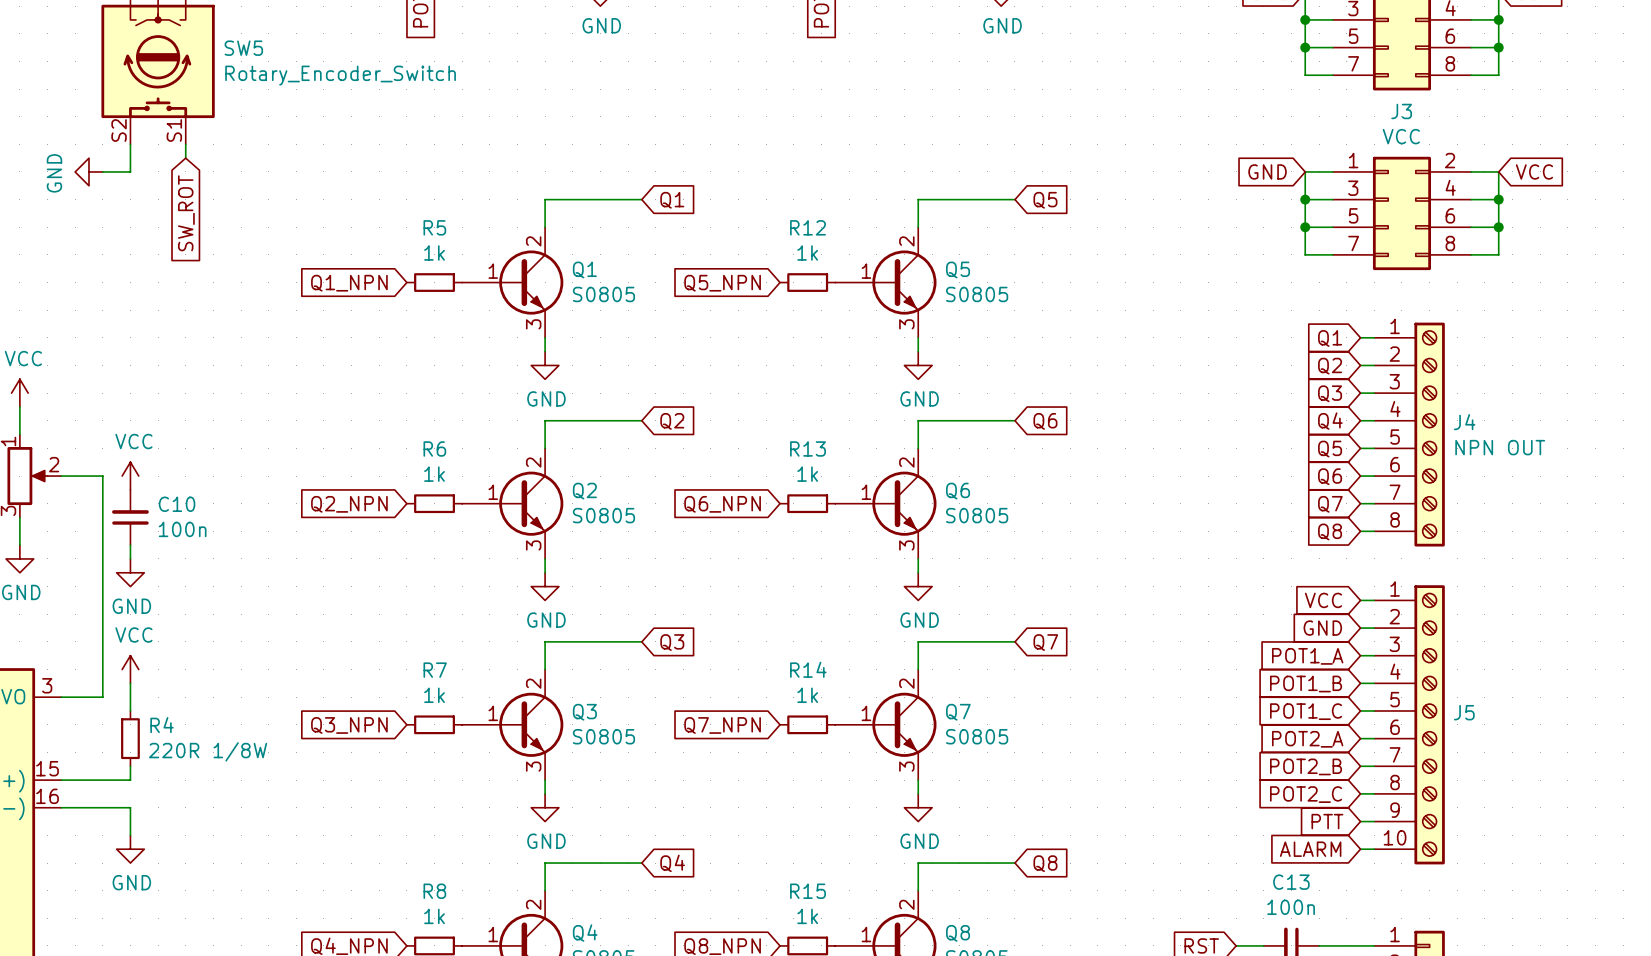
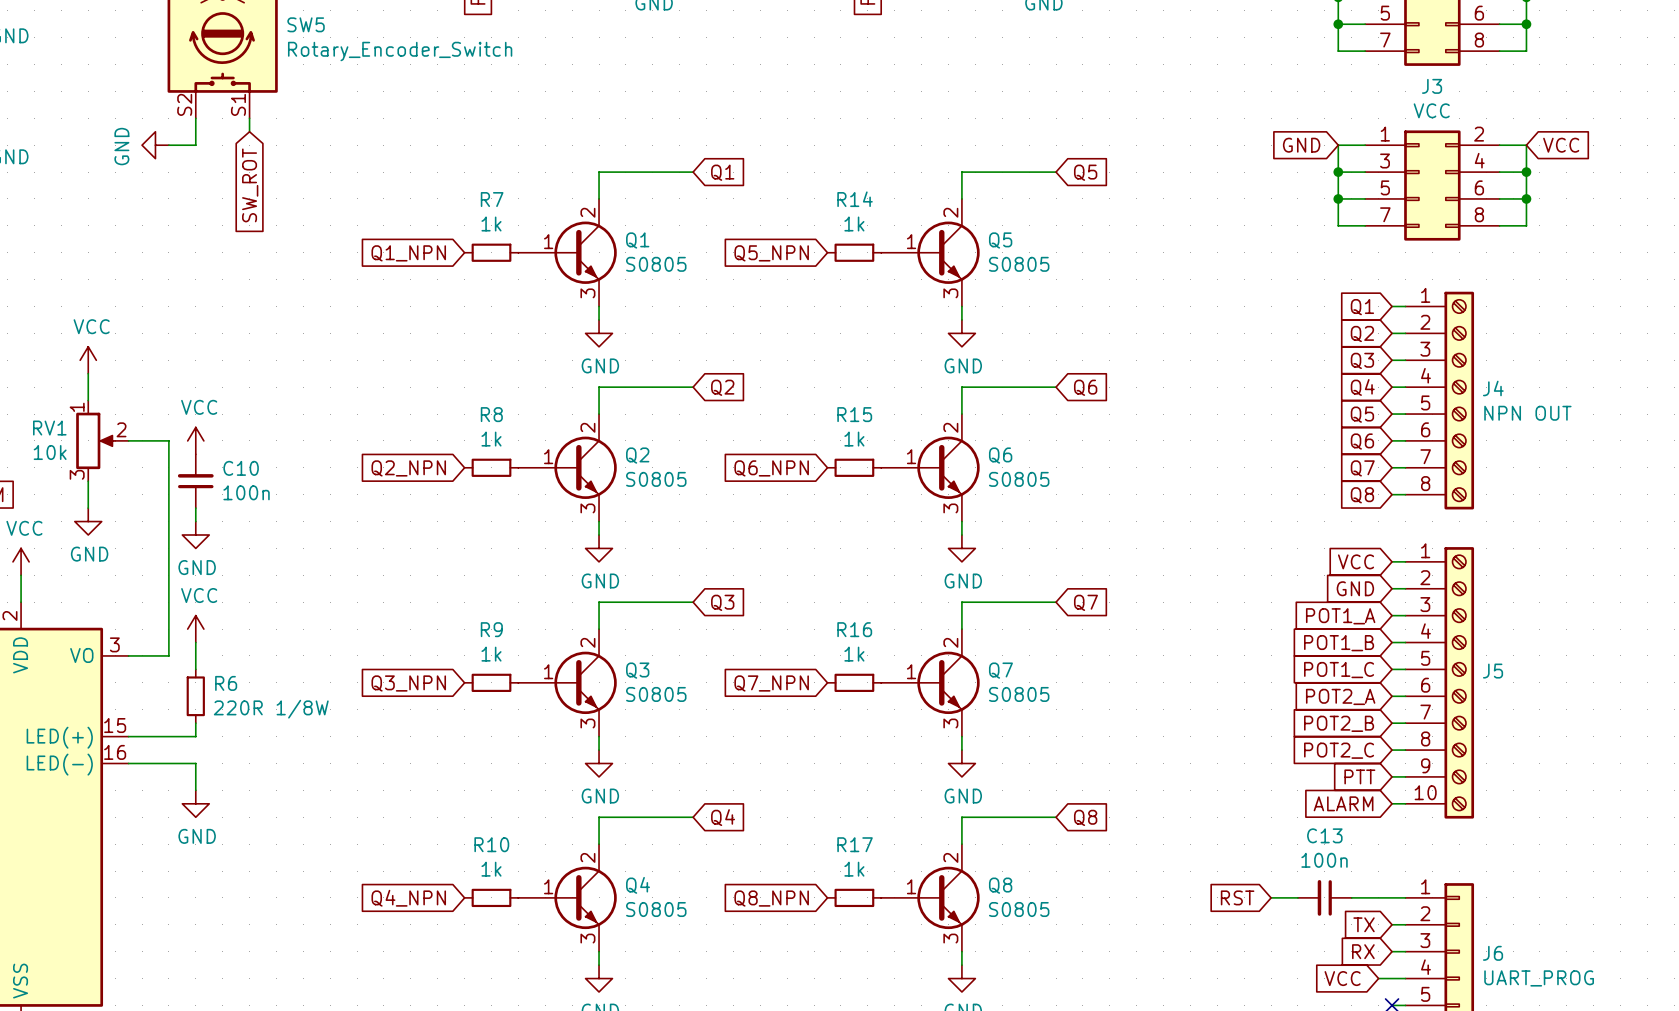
R5 name: R5 (434, 227) -> R7 (492, 199)
R12 name: R12 (808, 227) -> R14 (855, 199)
R6 name: R6 (434, 448) -> R8 (491, 414)
R13 name: R13 (808, 448) -> R15 (854, 414)
R14 name: R14 (808, 669) -> R16 (854, 629)
R7 name: R7 (435, 670) -> R9 (491, 629)
R4 name: R4 (162, 725) -> R6 (226, 683)
R8 name: R8 (434, 891) -> R10 (491, 844)
R15 name: R15 (808, 891) -> R17 (855, 844)

